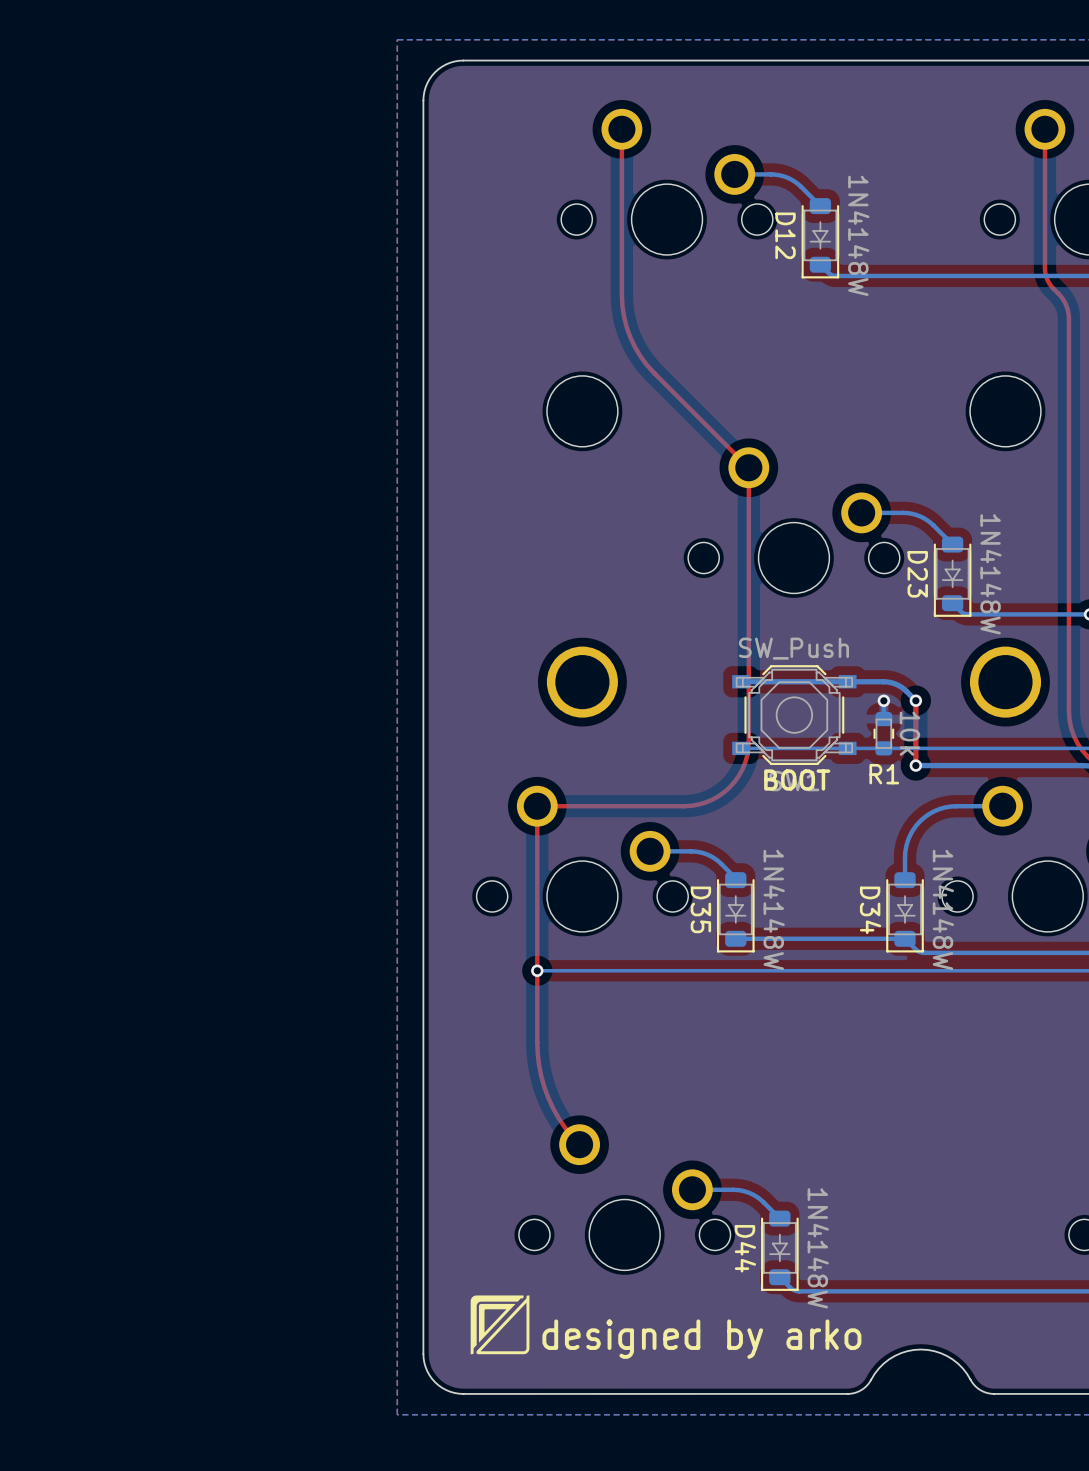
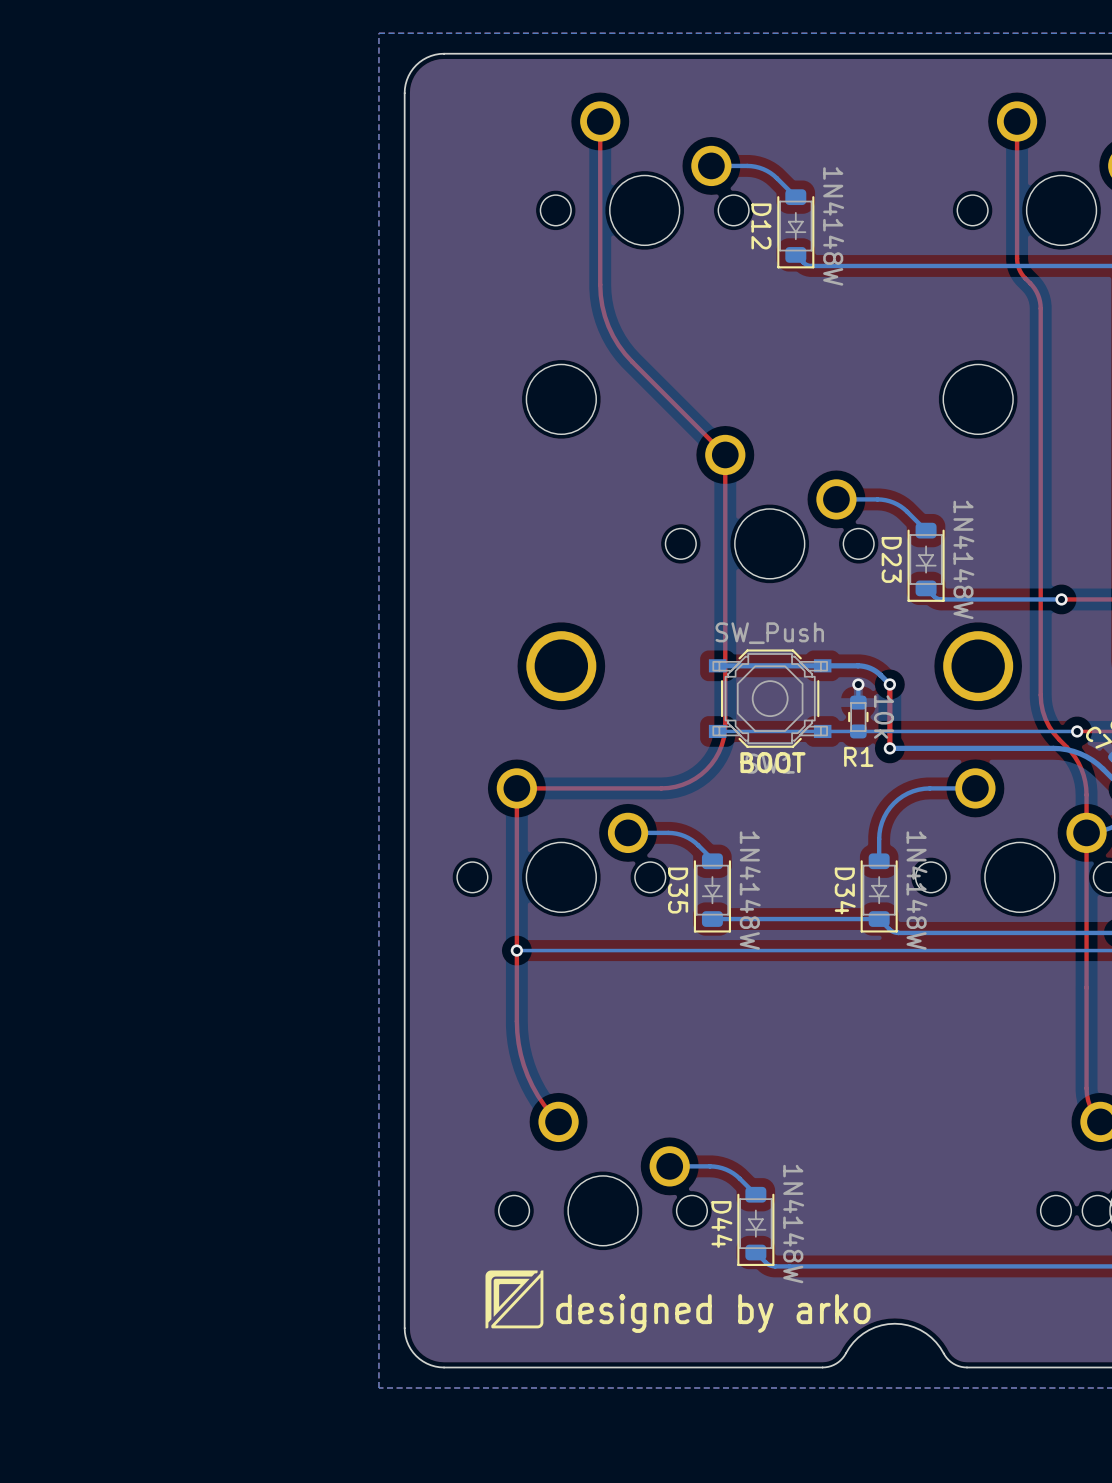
drawing position: (497, 1323) -> (511, 1297)
drawing position: (497, 1324) -> (511, 1299)
drawing position: (502, 1324) -> (517, 1299)
text position: designed by arko (701, 1339) -> designed by arko (713, 1313)

